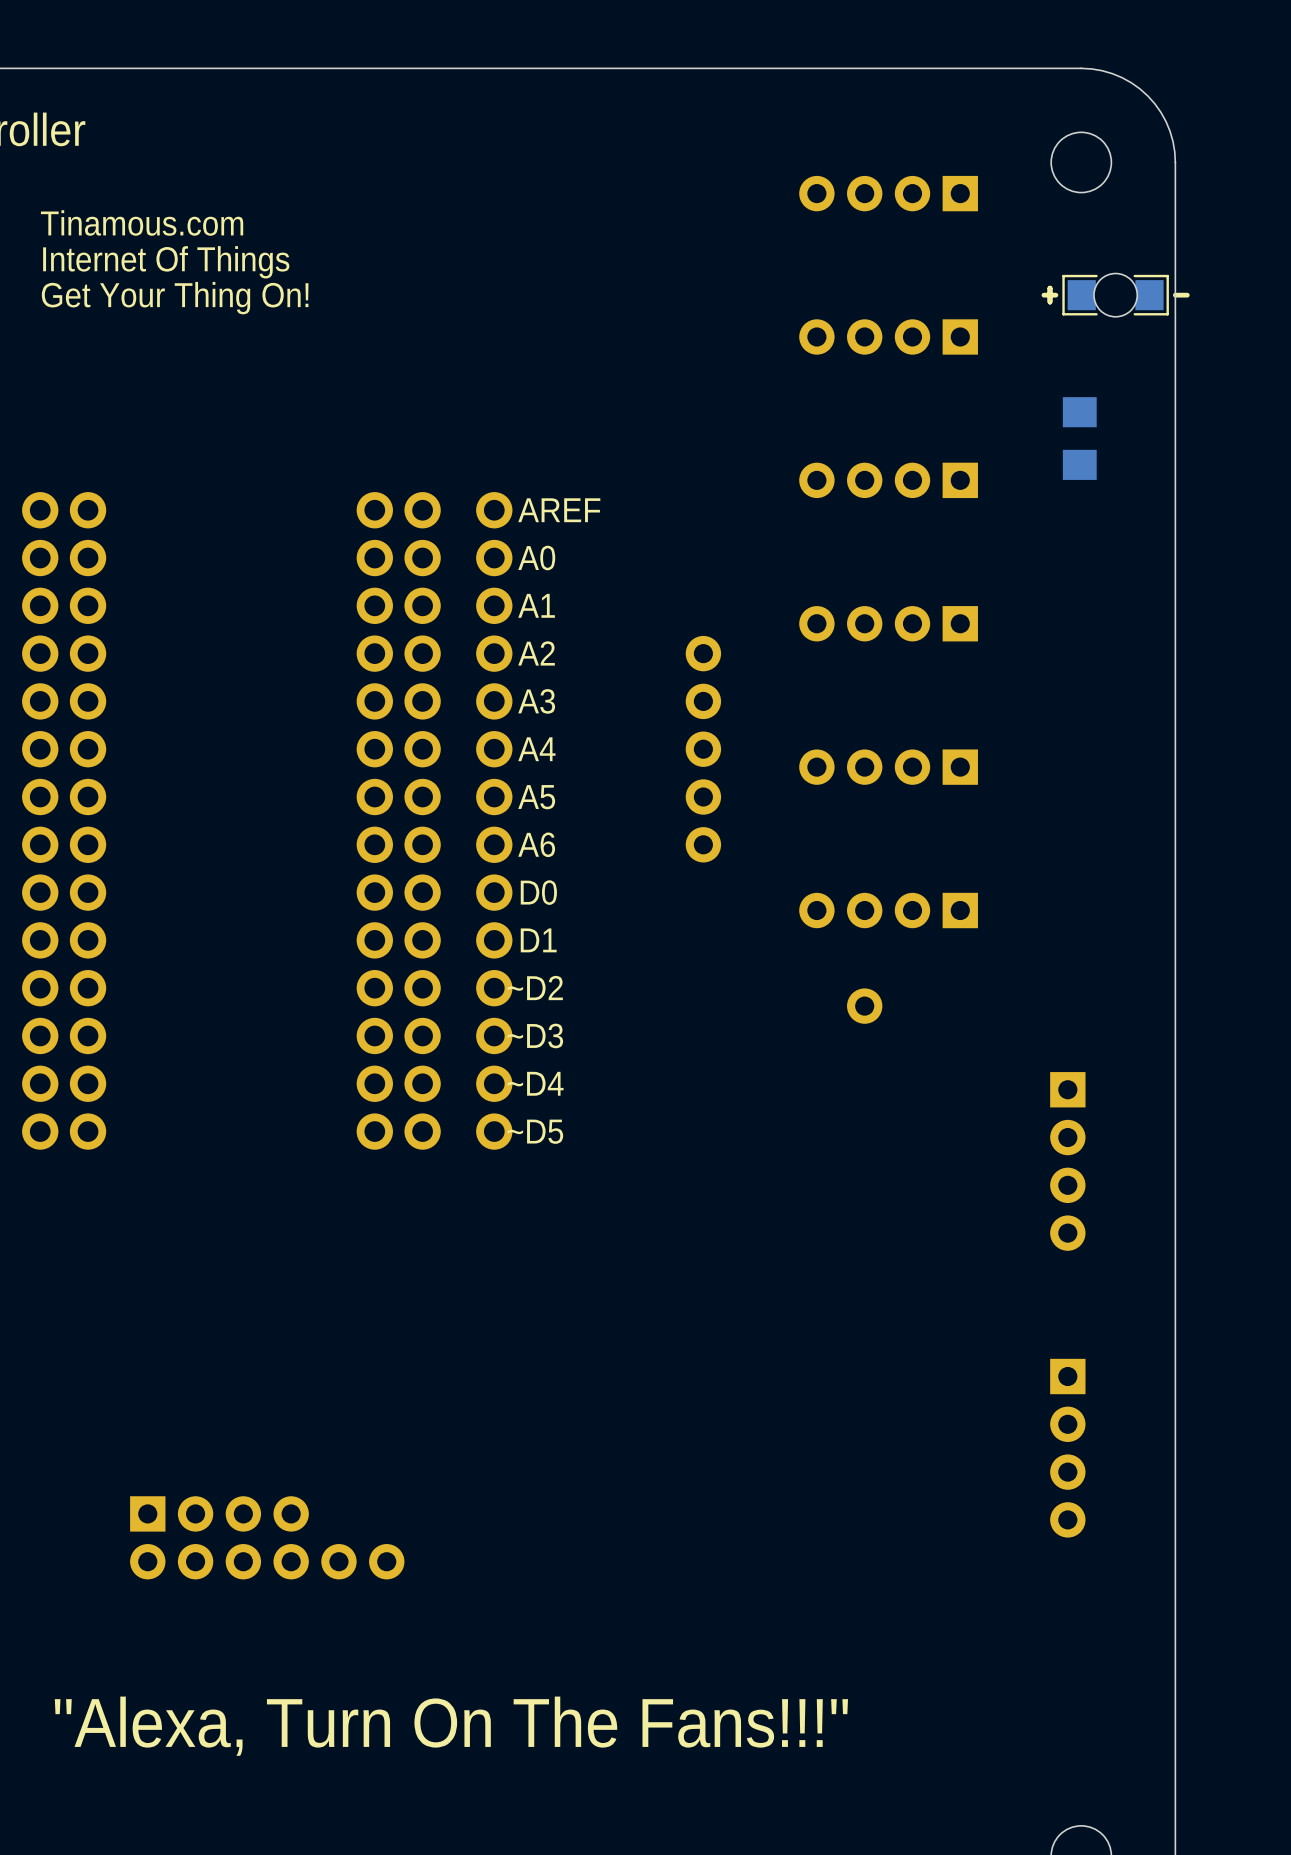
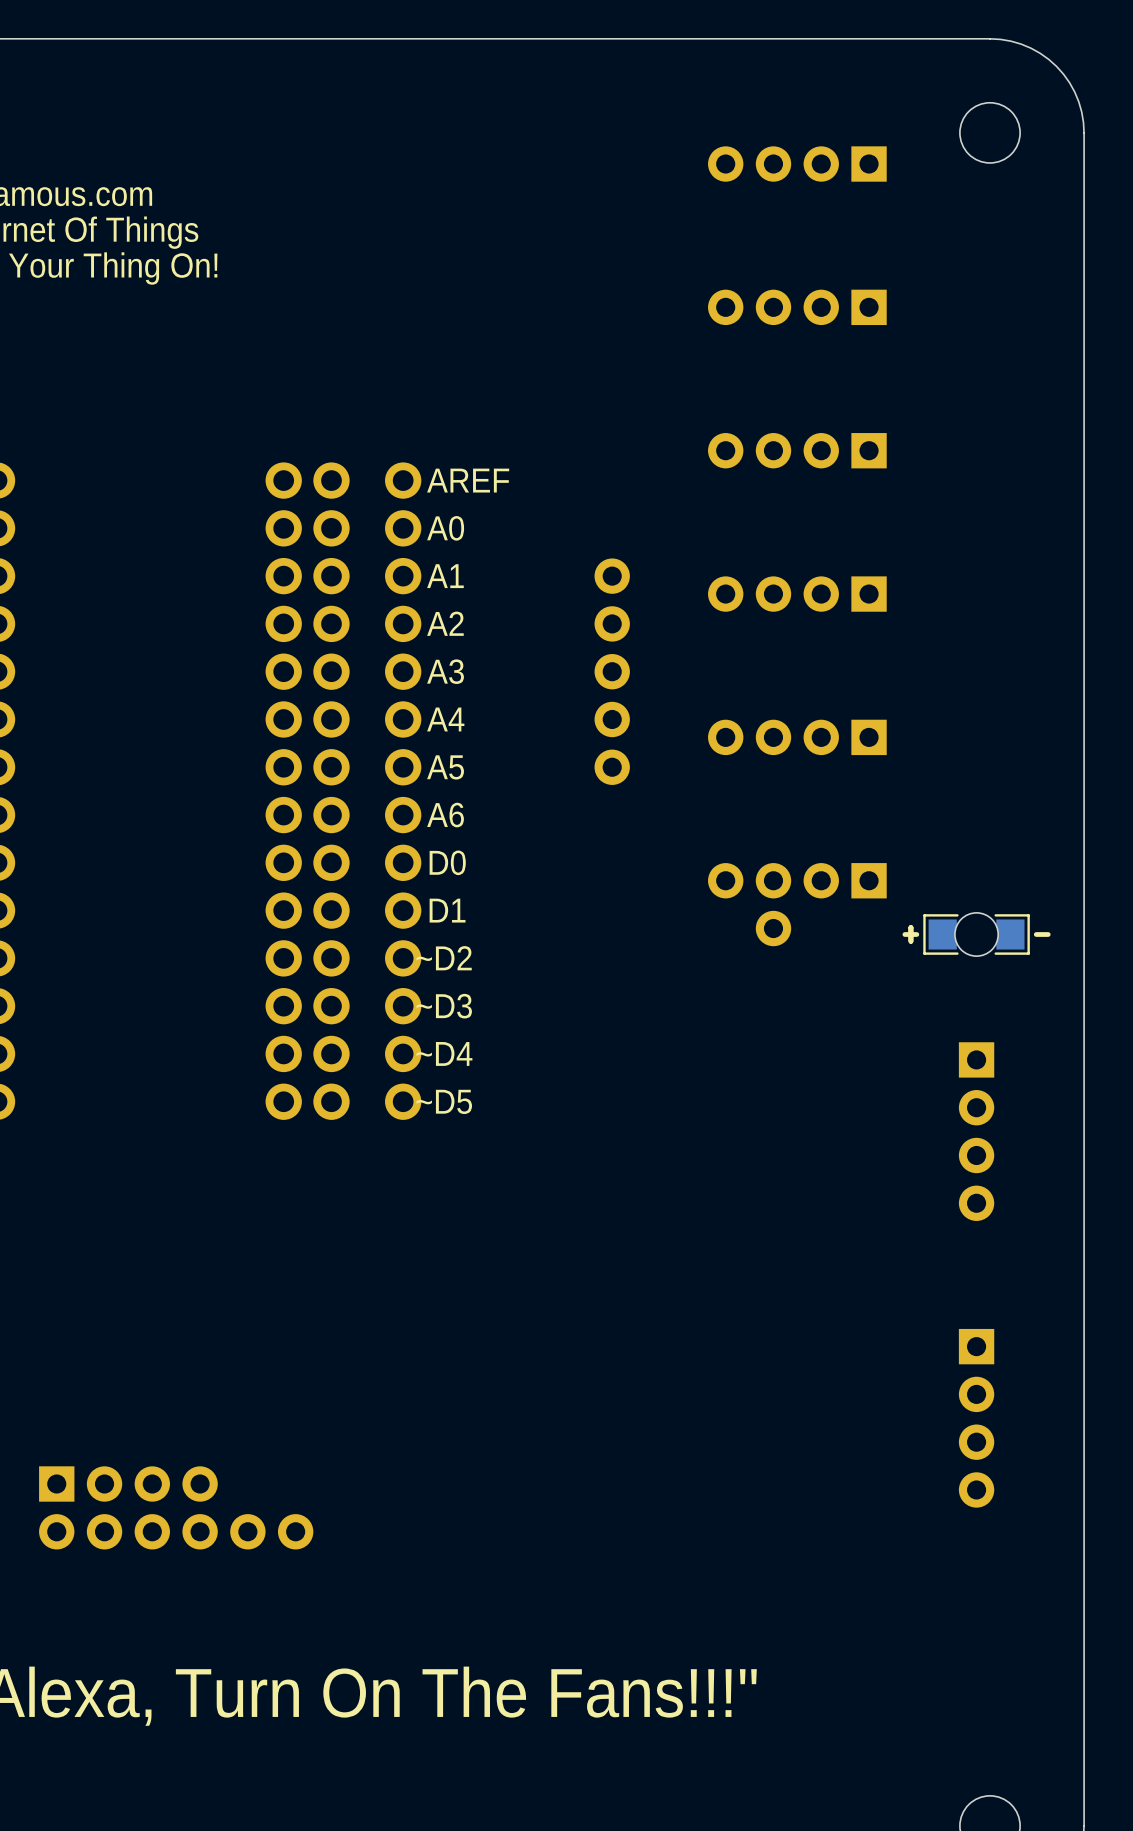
part: (1115, 295) -> none
part: (1079, 438) -> none
part position: (703, 749) -> (612, 671)
part: none -> (976, 934)
part position: (864, 1006) -> (773, 928)

